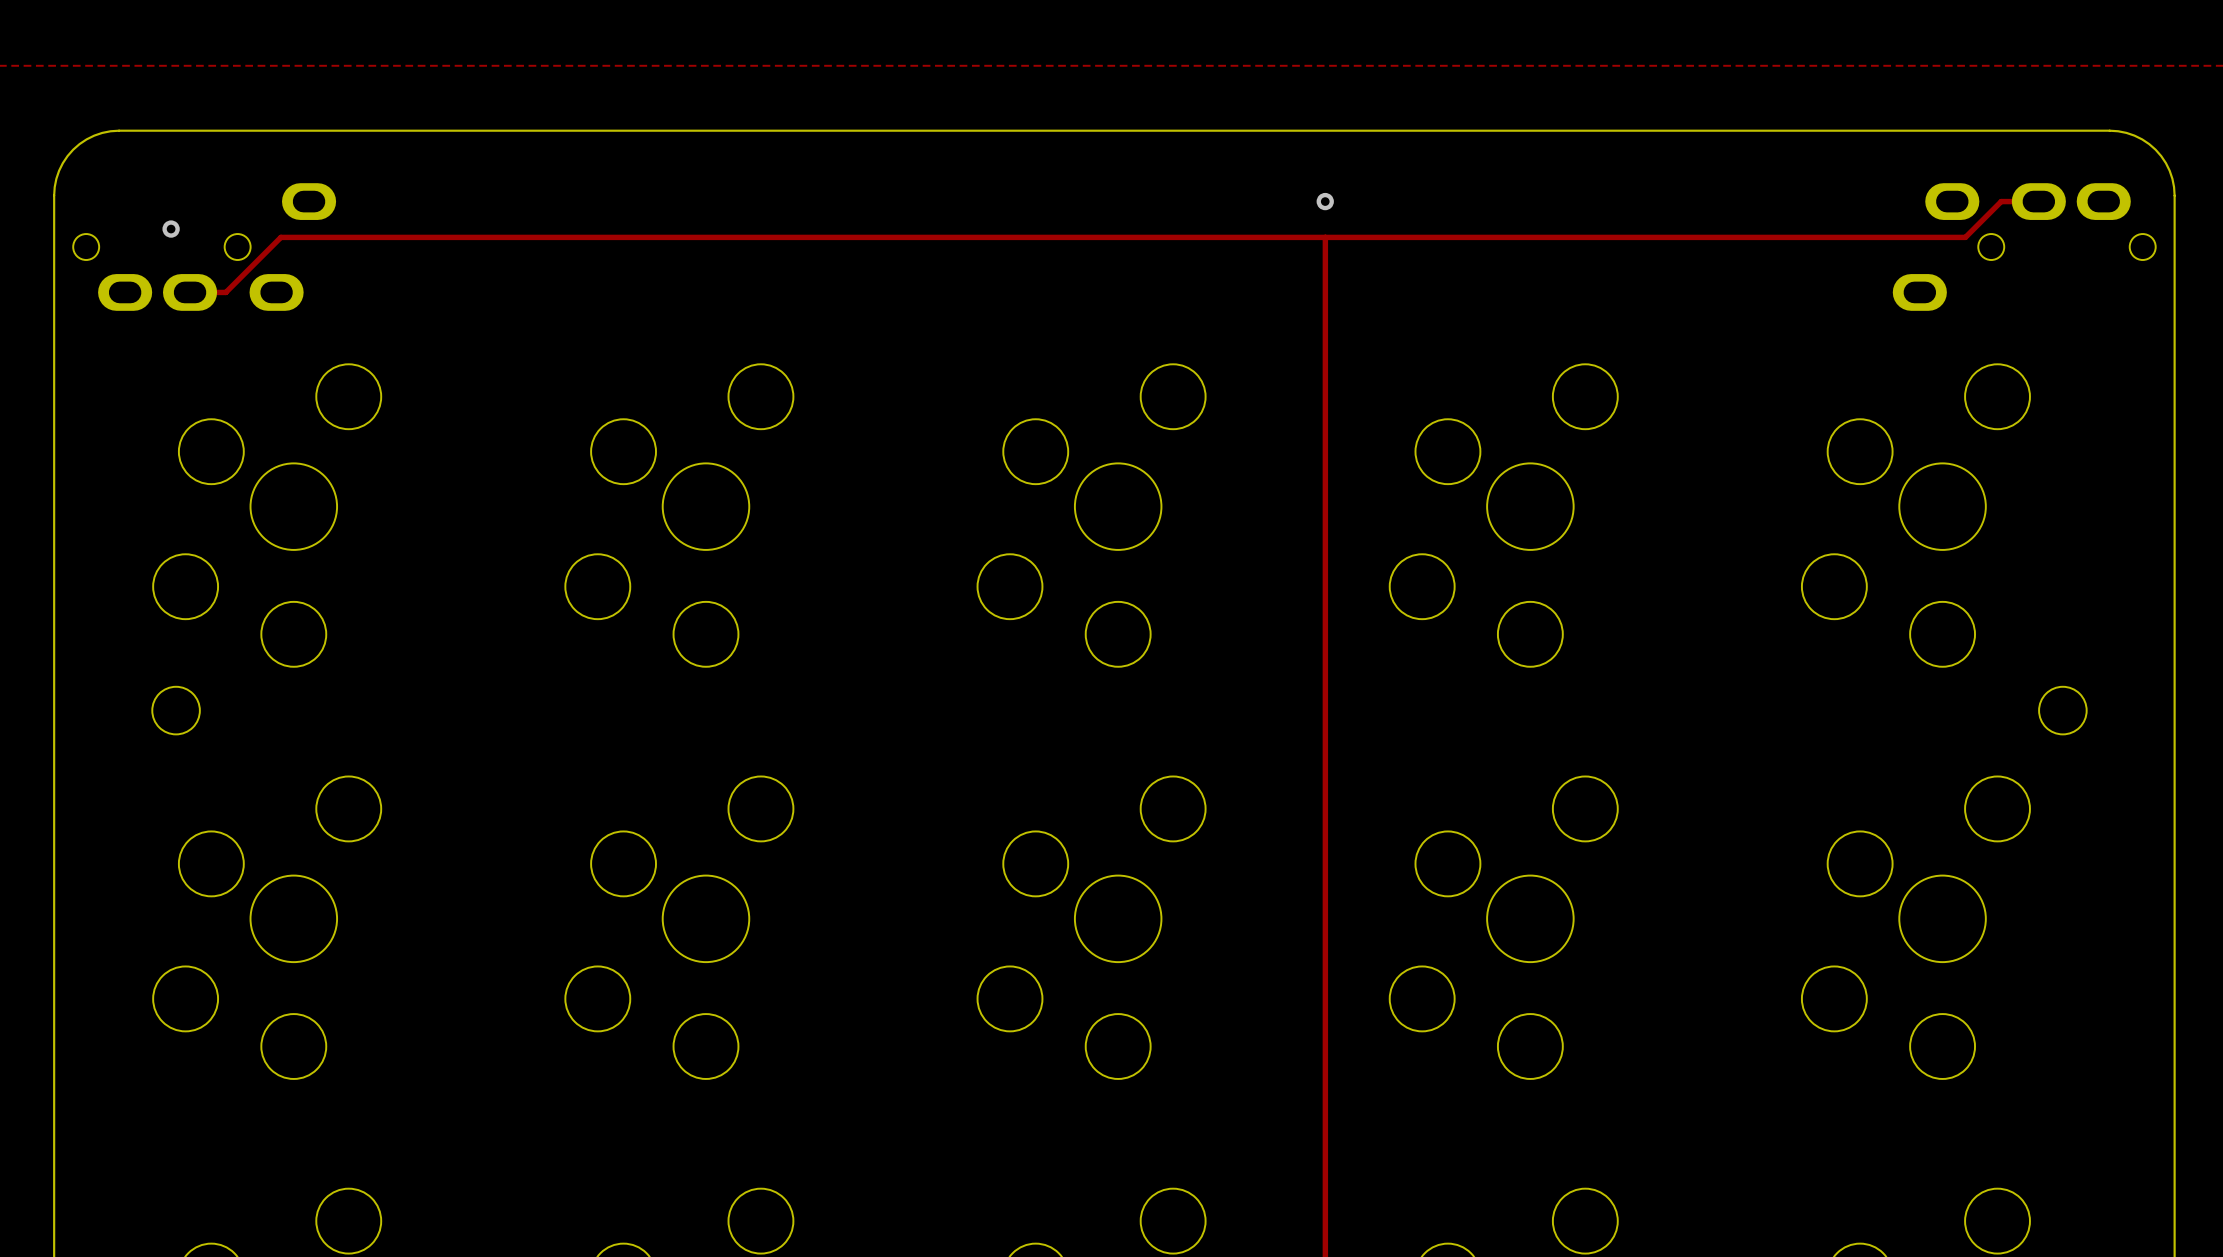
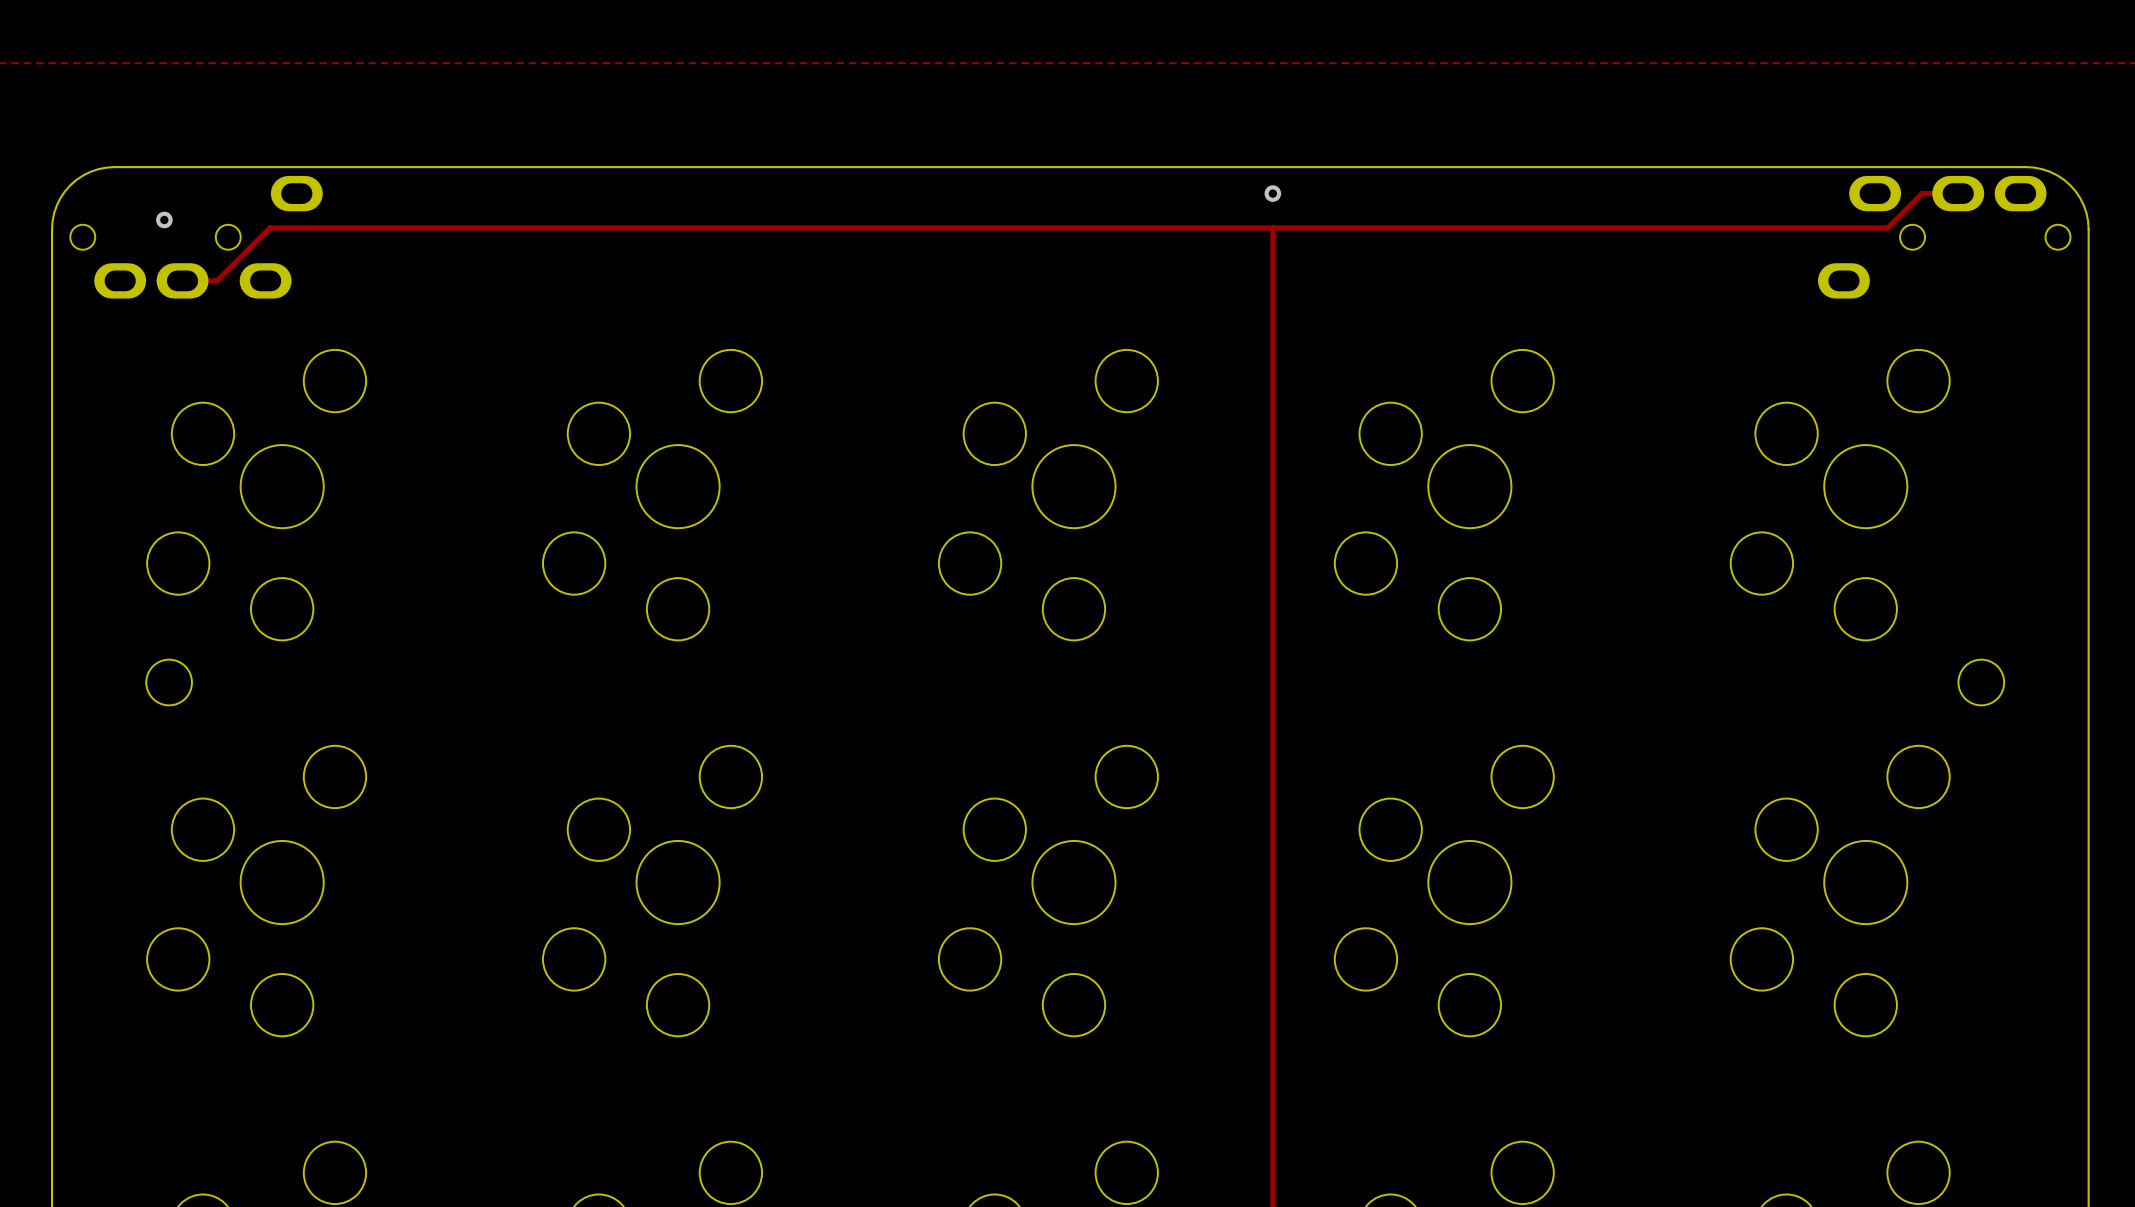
board edge: (54, 238) (54, 187) (62, 163) (73, 149) (86, 139) (102, 132) (119, 130) (2109, 130) (2126, 132) (2142, 139) (2155, 149) (2165, 163) (2174, 187) (2174, 238) -> (52, 229) (56, 205) (70, 185) (90, 171) (114, 167) (2026, 167) (2050, 171) (2070, 185) (2083, 205) (2088, 229)

